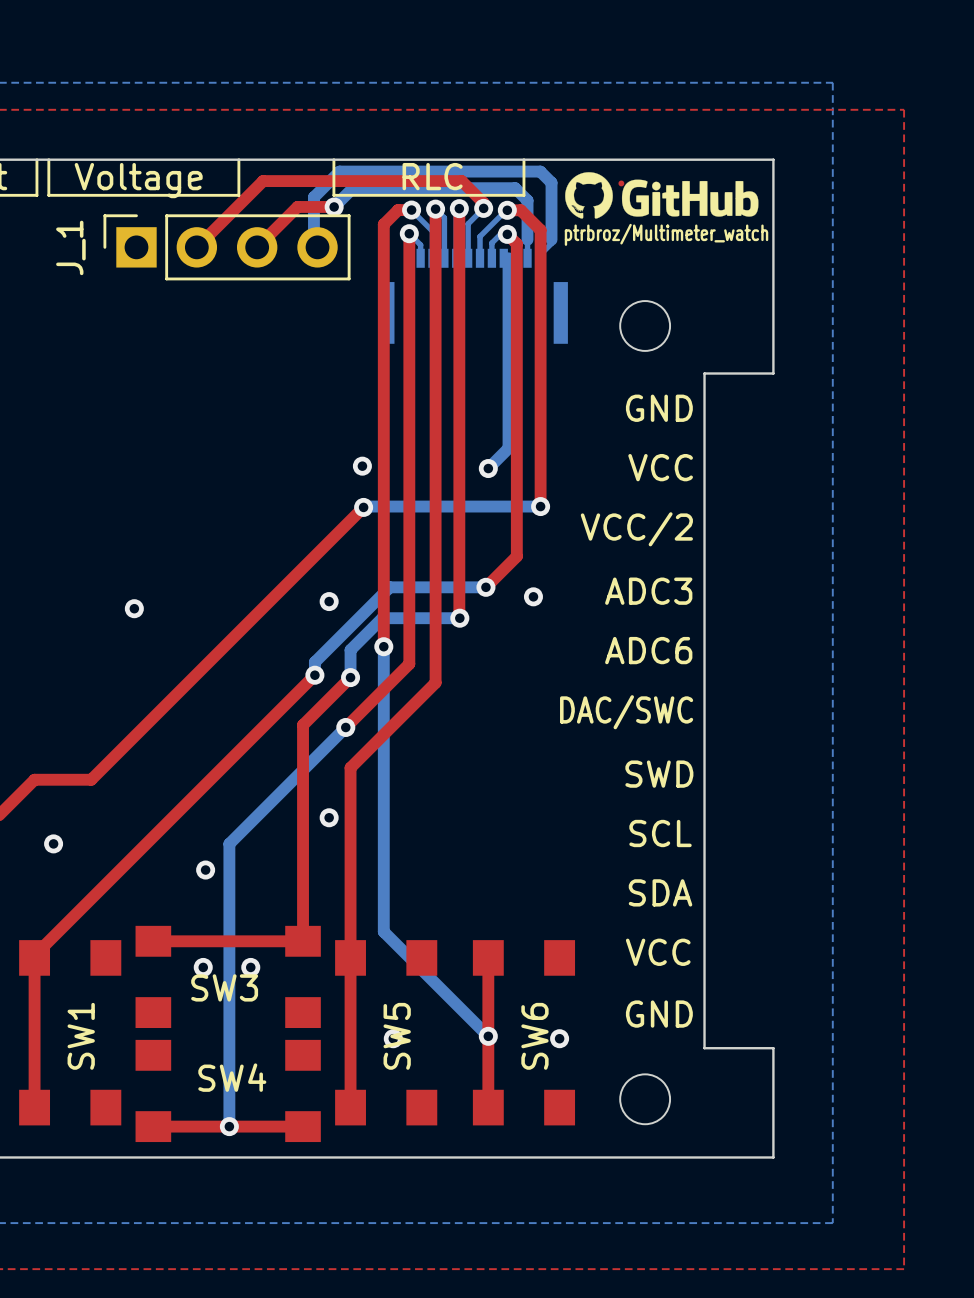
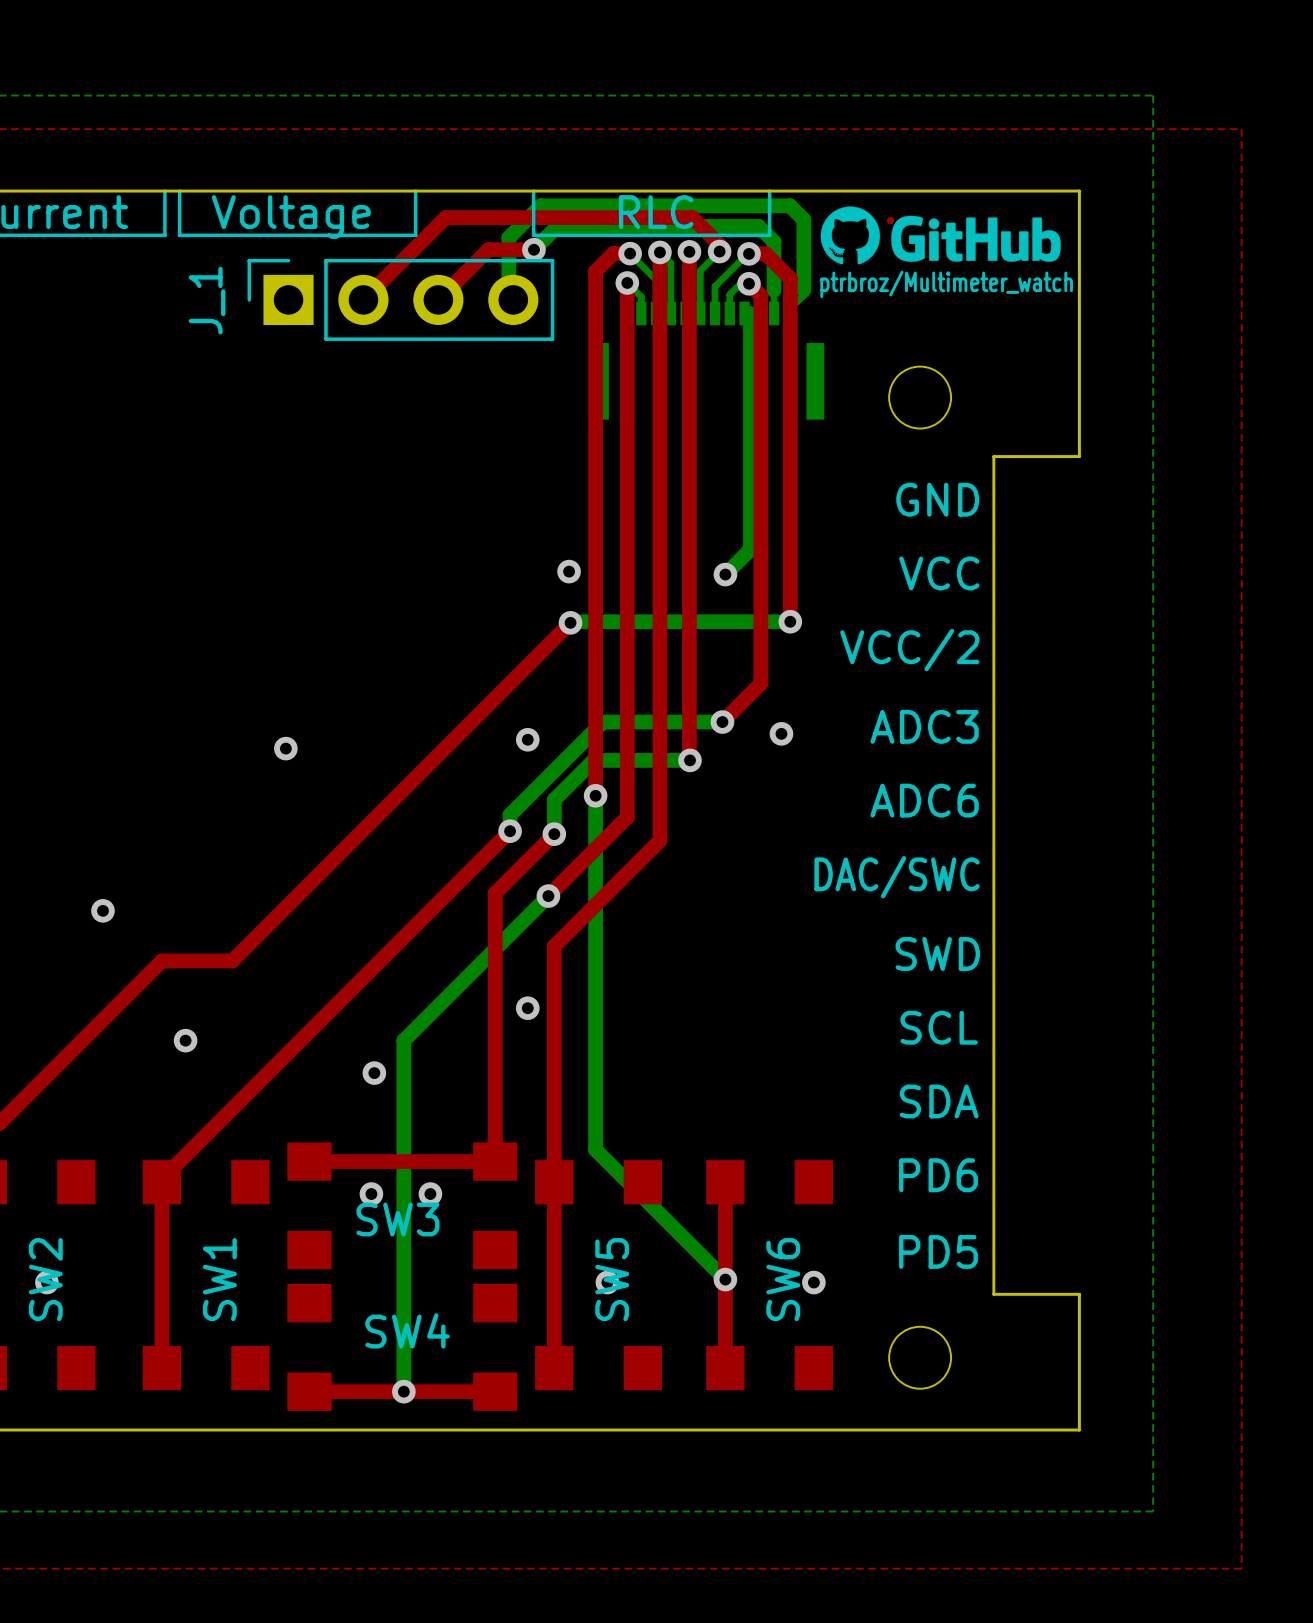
text: VCC (658, 952) -> PD6 (938, 1175)
text: GND (659, 1014) -> PD5 (938, 1251)

